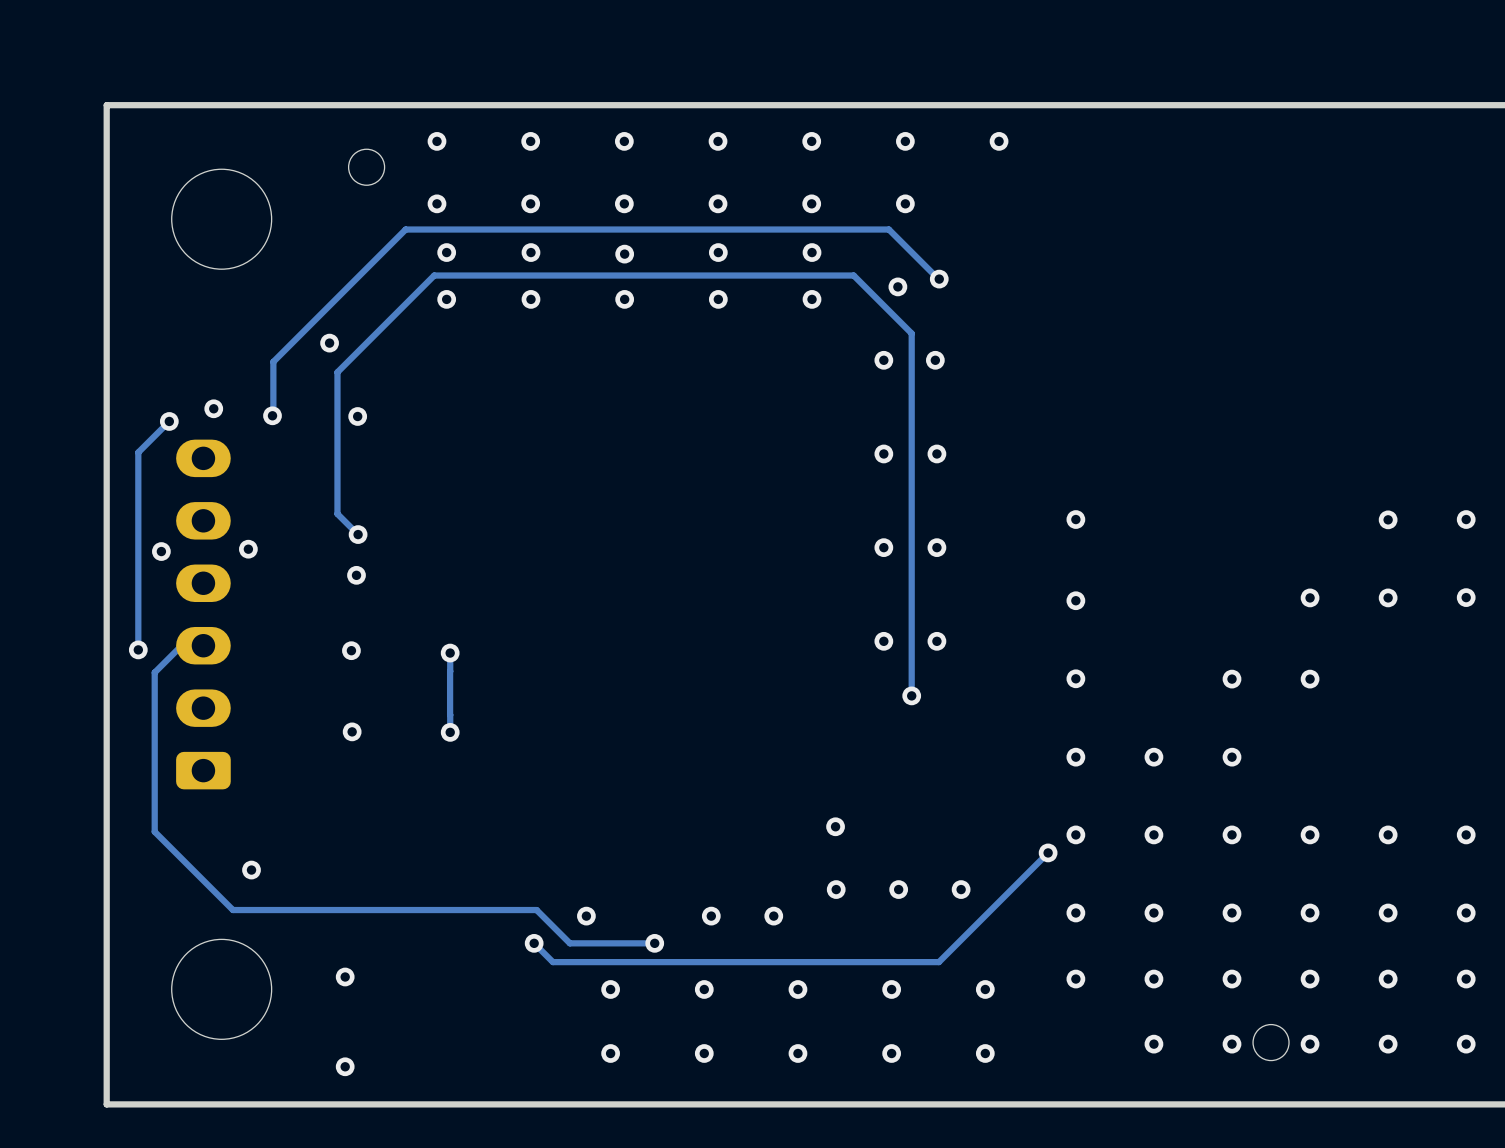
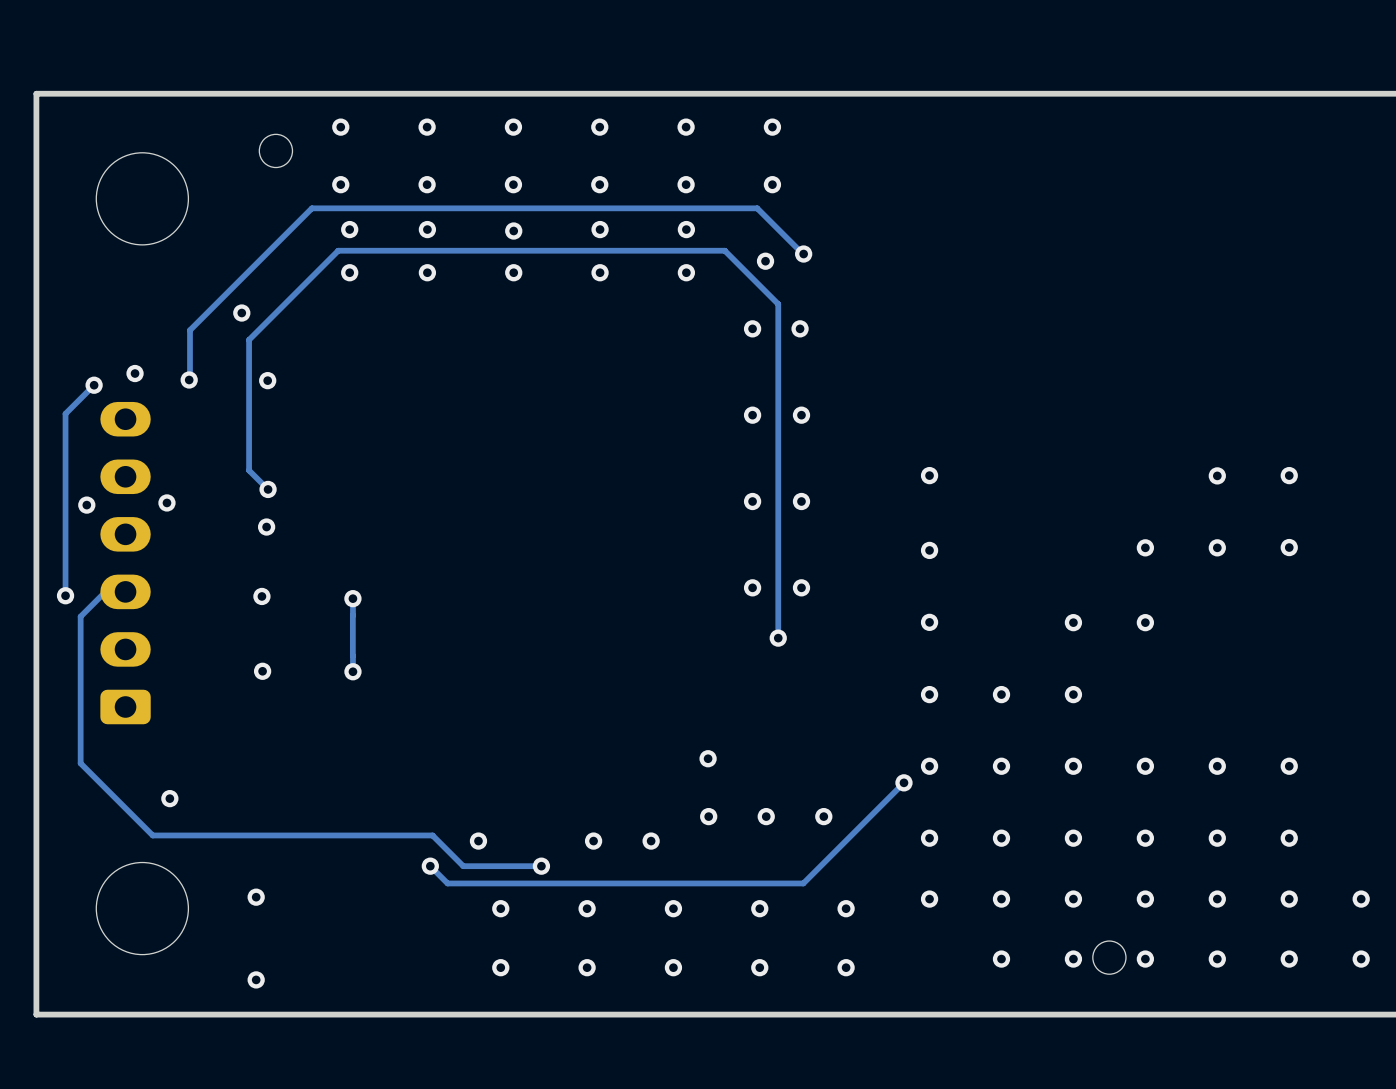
via: (999, 141) -> none

